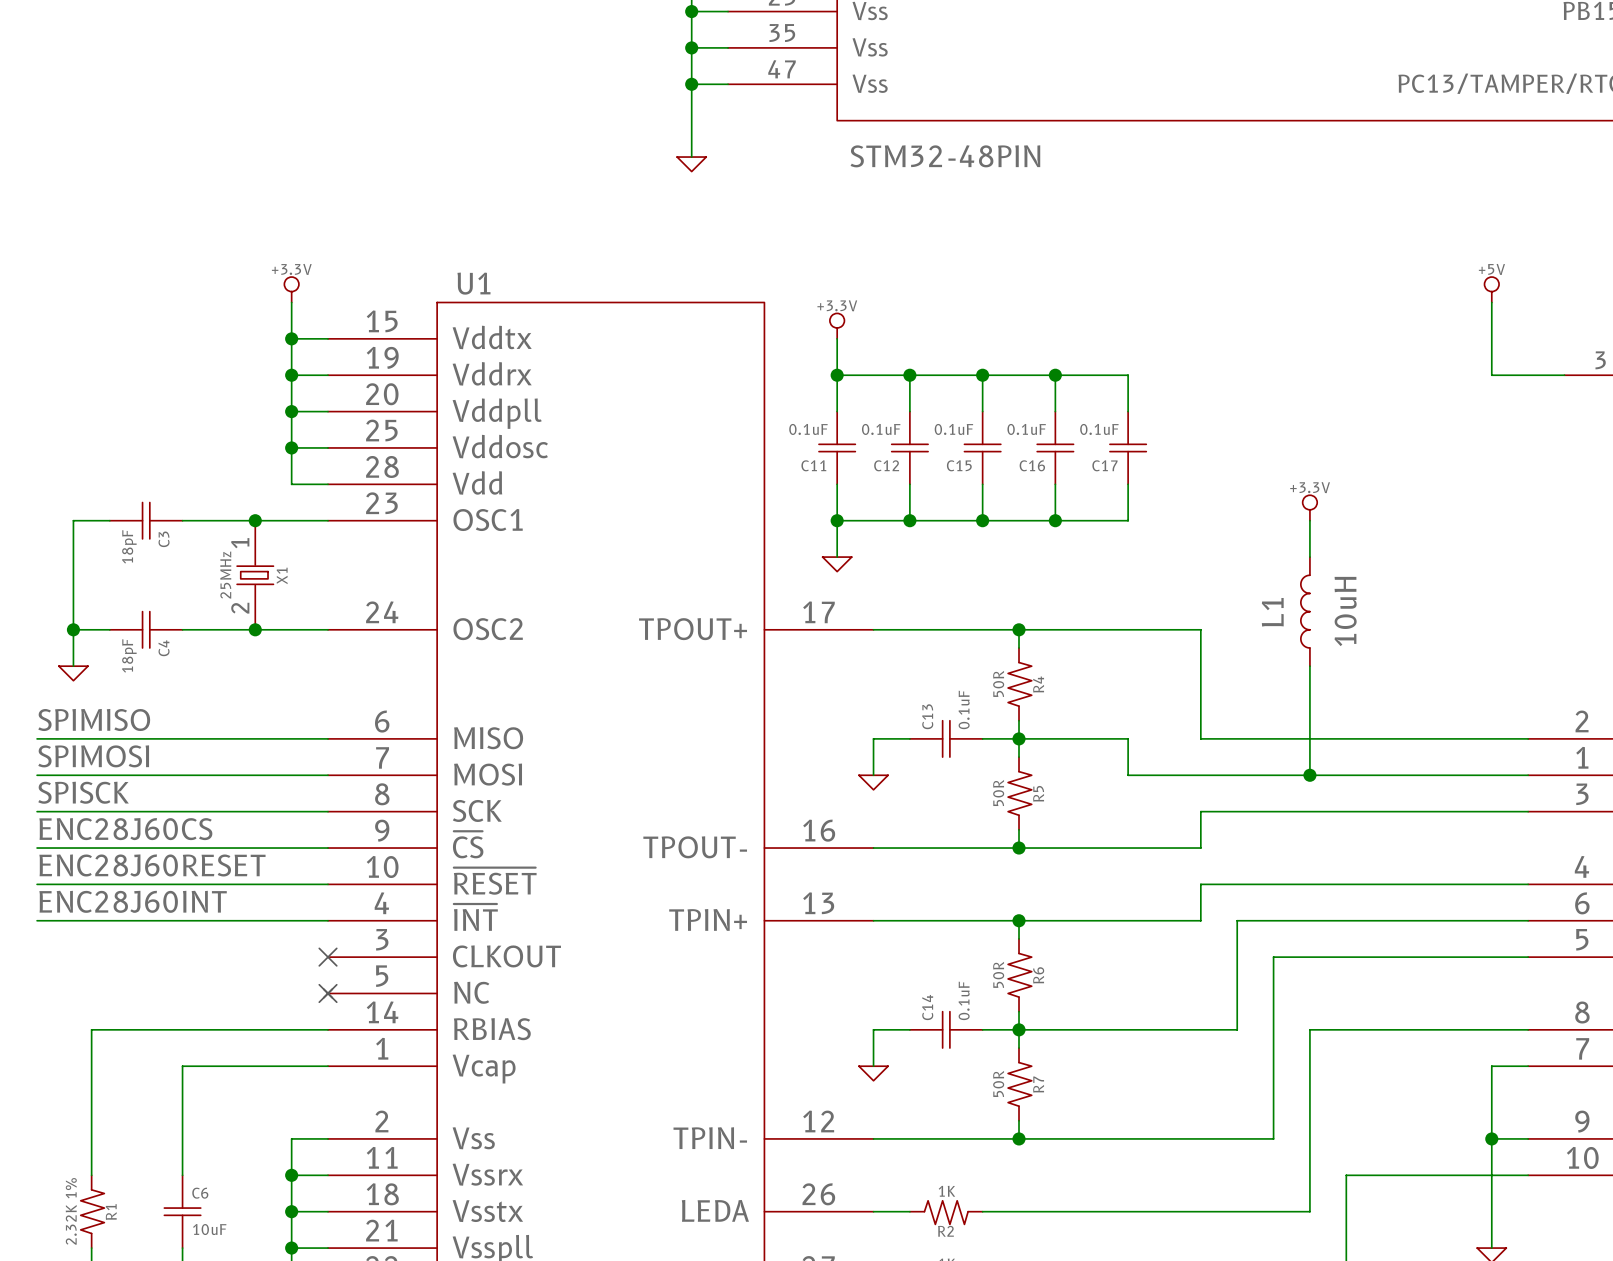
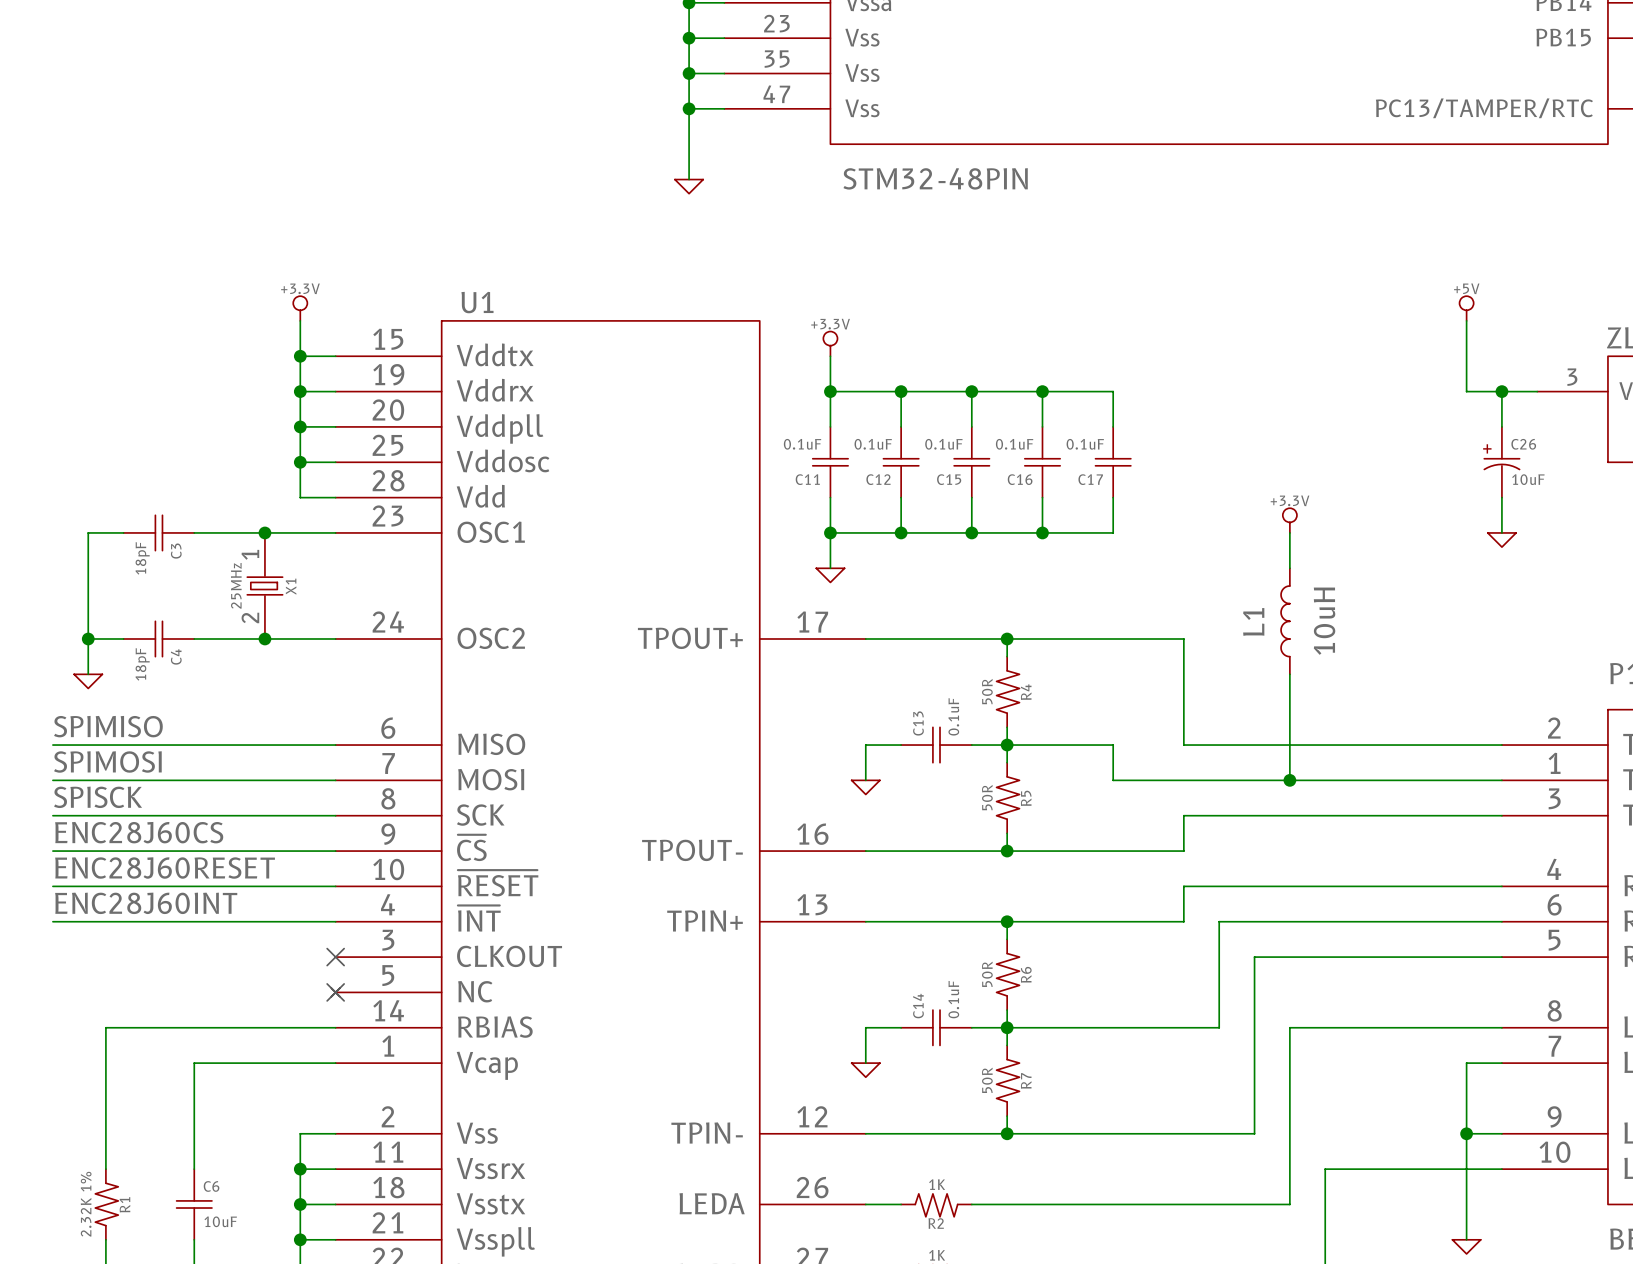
wire: none -> (1501, 391) (1501, 426)
junction: none -> (1501, 391)
C26: none -> 10uF (1501, 462)
wire: none -> (1501, 497) (1501, 532)
power symbol: none -> (1501, 540)

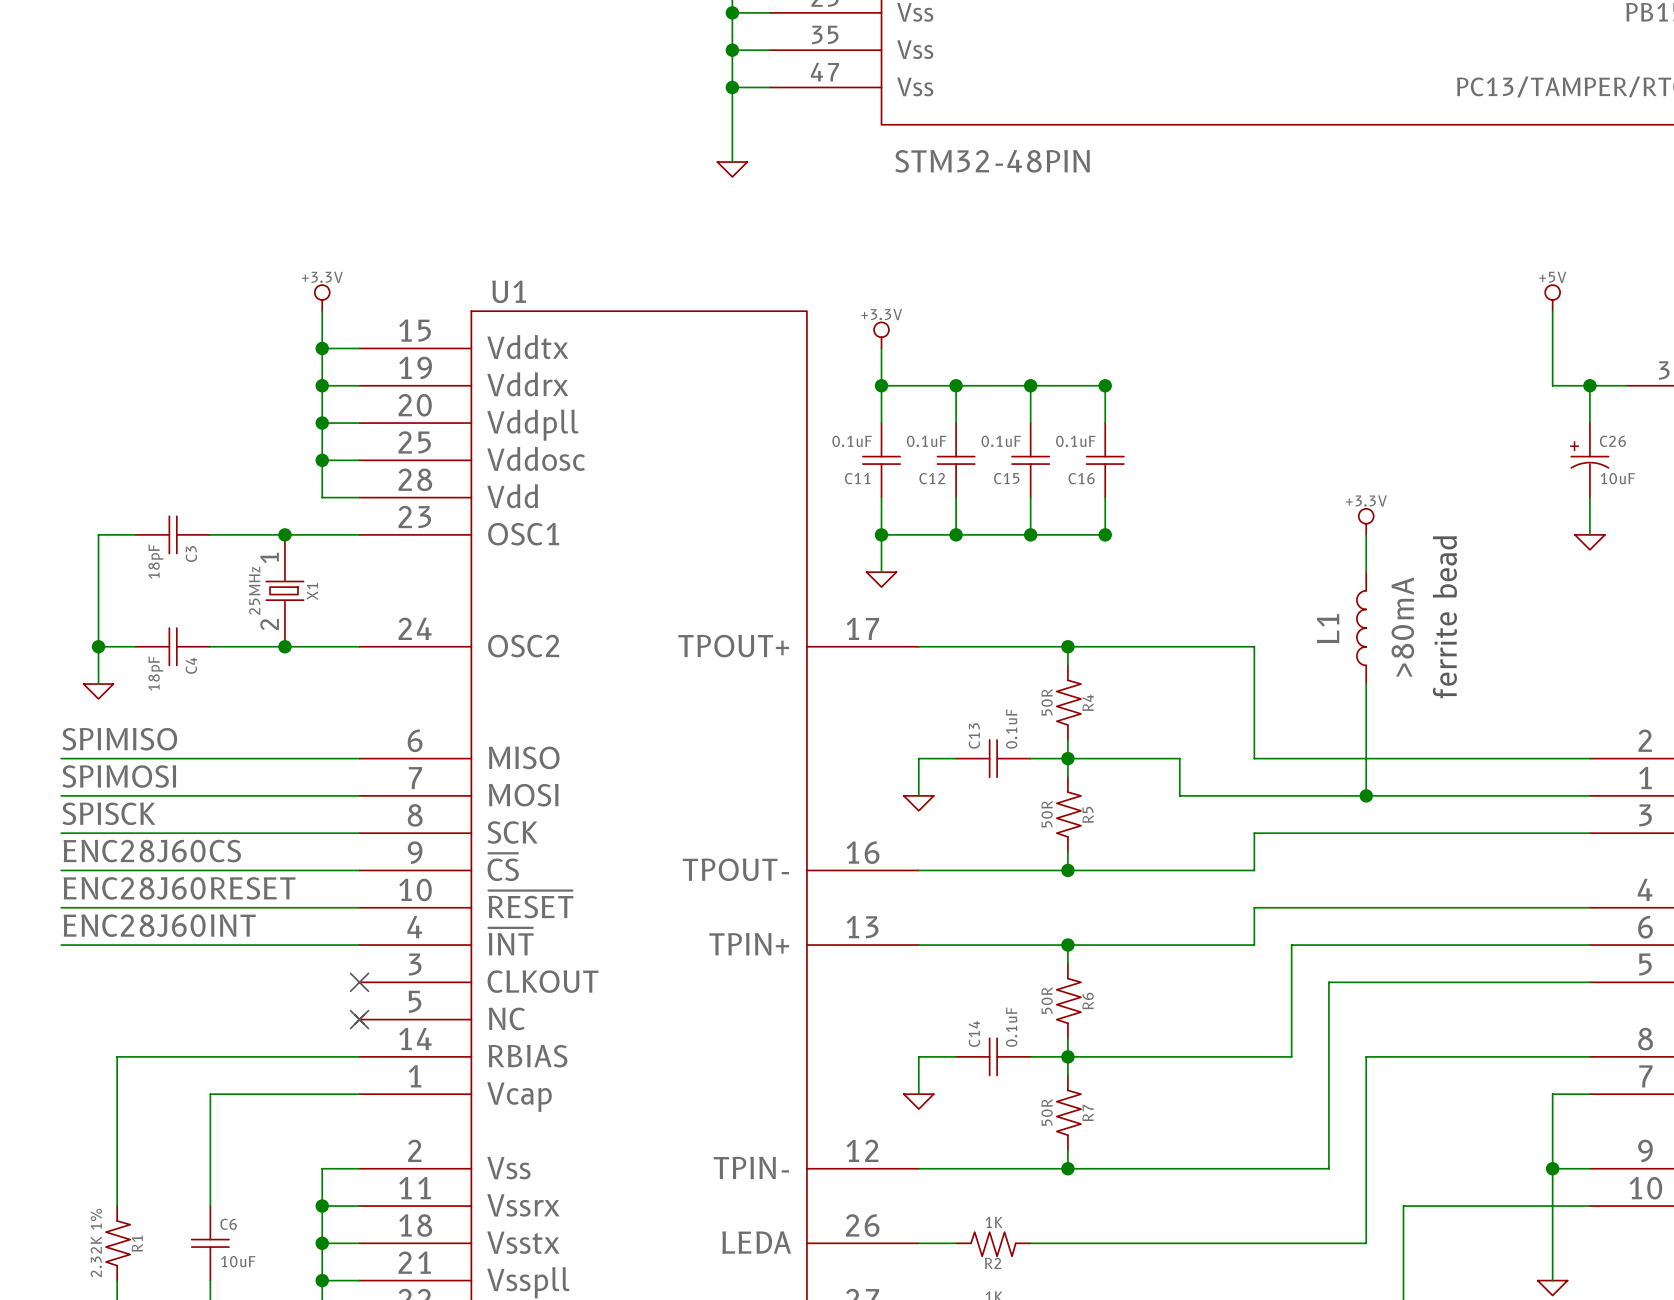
wire: (1042, 391) (1113, 391) (1113, 426) -> none
C17: 0.1uF (1113, 462) -> none
wire: (1113, 497) (1113, 532) (1042, 532) -> none
text: none -> ferrite bead (1444, 617)
L1 value: 10uH (1324, 621) -> >80mA (1402, 627)

